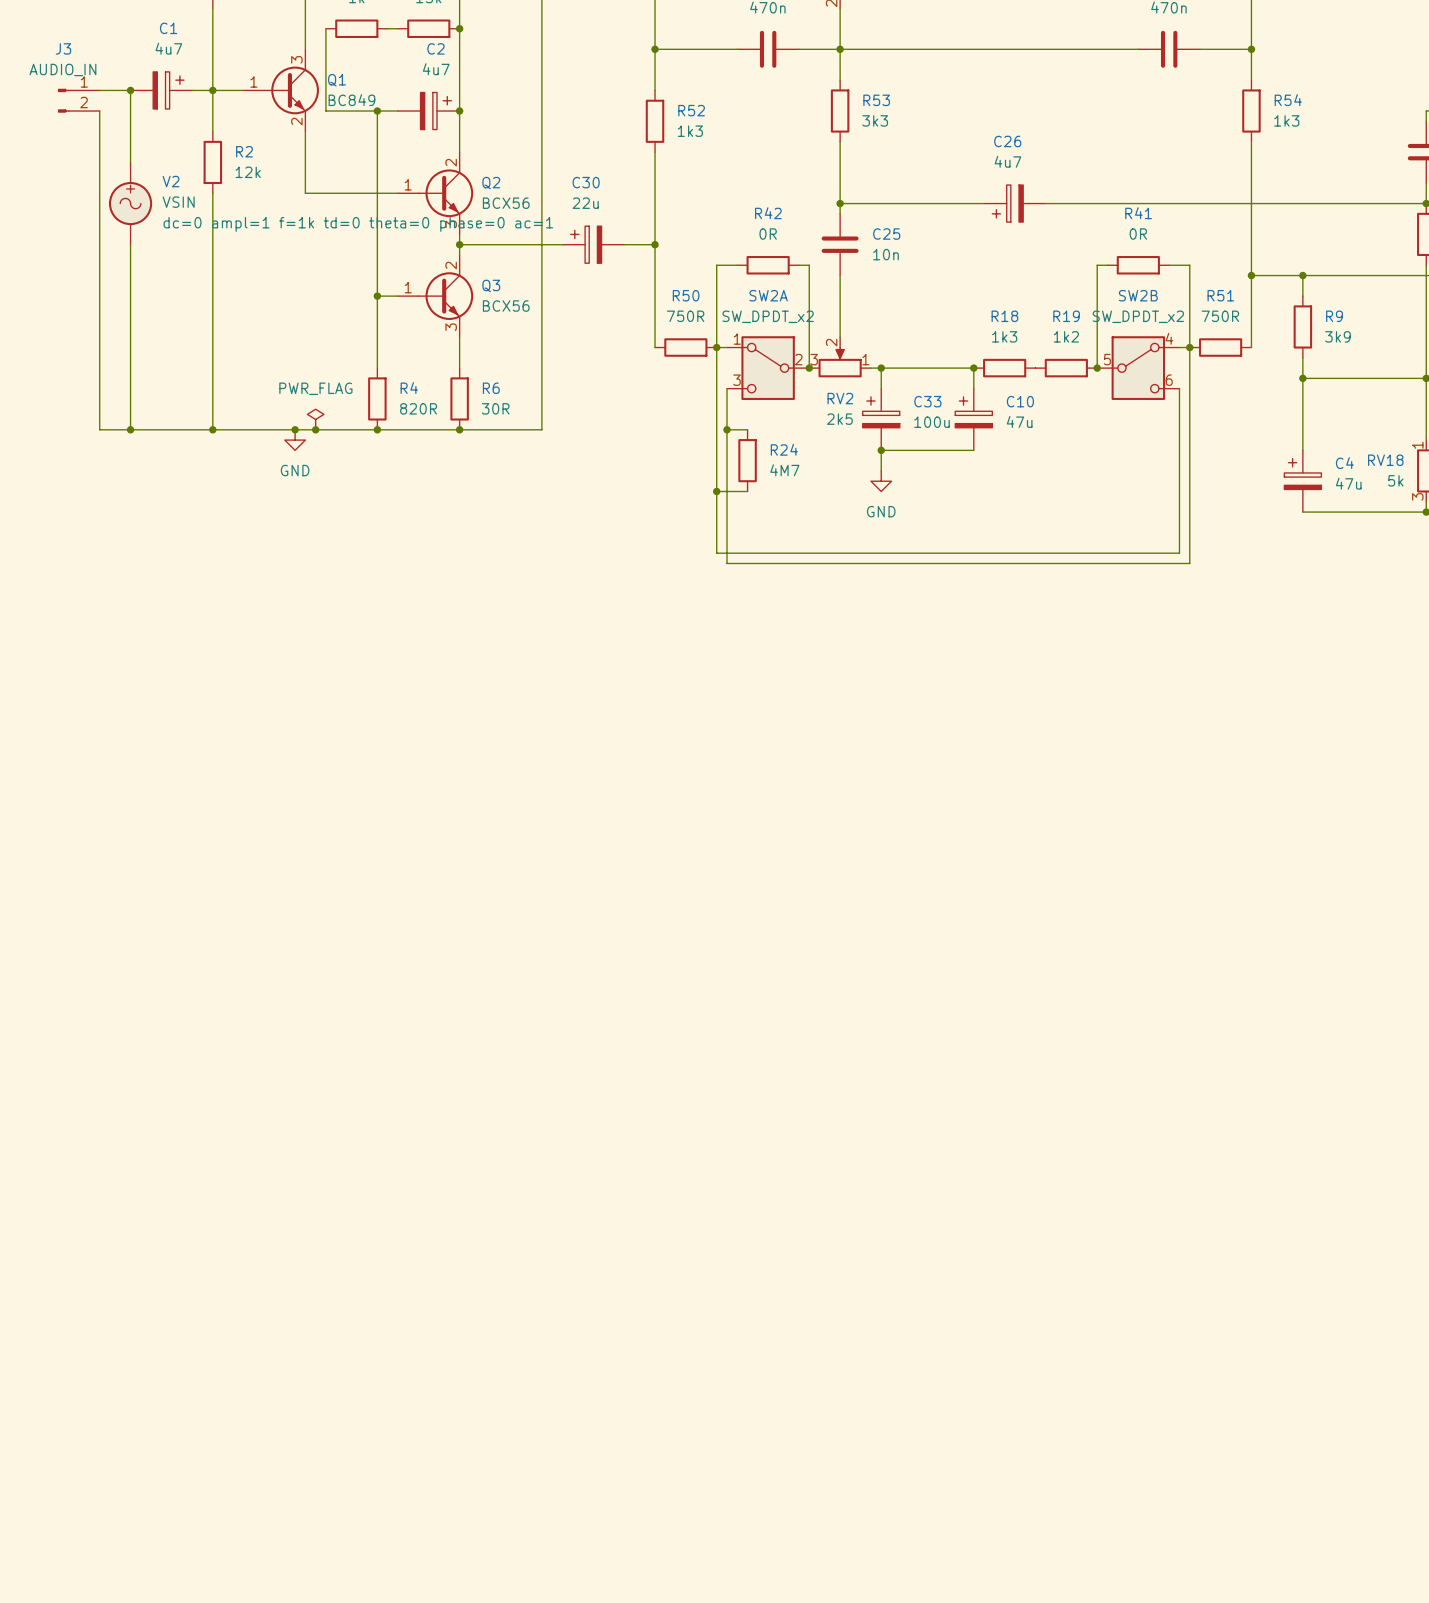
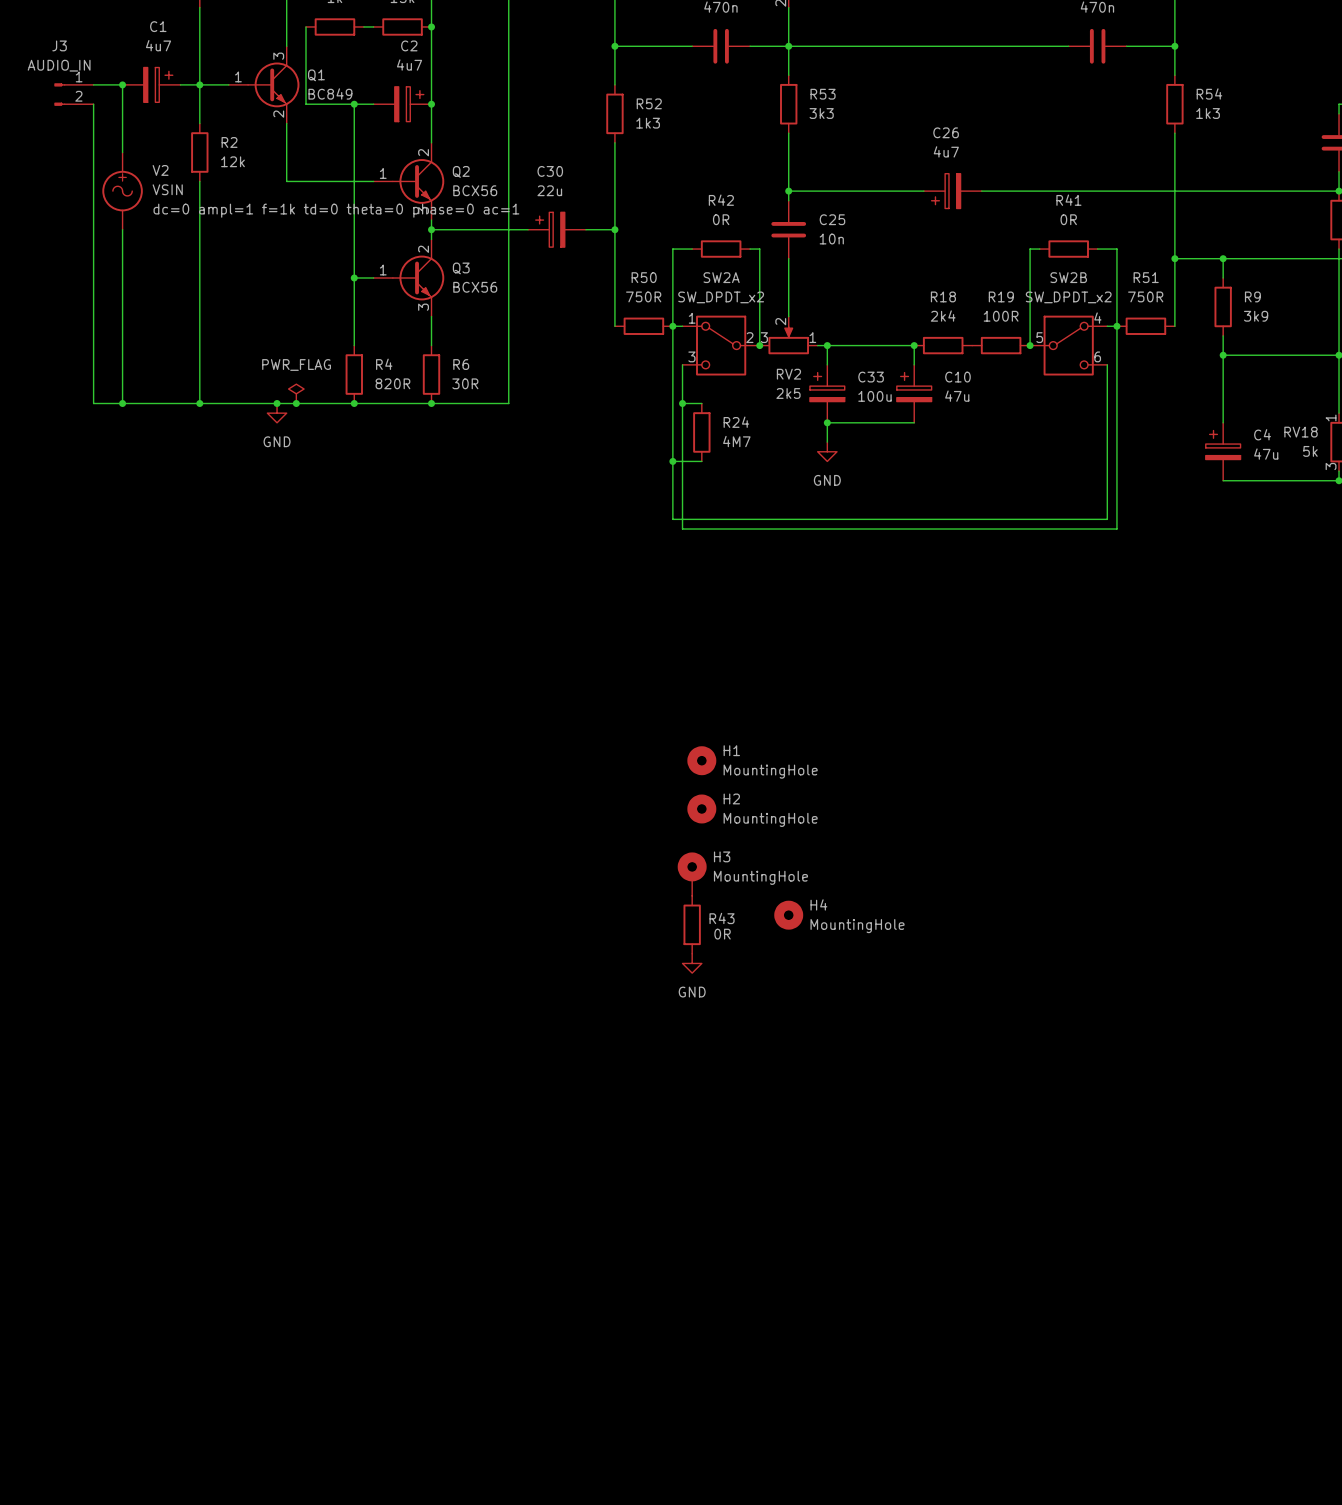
R18 value: 1k3 (1004, 336) -> 2k4 (943, 316)
R19 value: 1k2 (1066, 336) -> 100R (1001, 316)
H1: none -> MountingHole (701, 760)
H2: none -> MountingHole (701, 808)
H3: none -> MountingHole (692, 874)
H4: none -> MountingHole (788, 915)
R43: none -> 0R (692, 924)
power symbol: none -> GND (692, 963)

